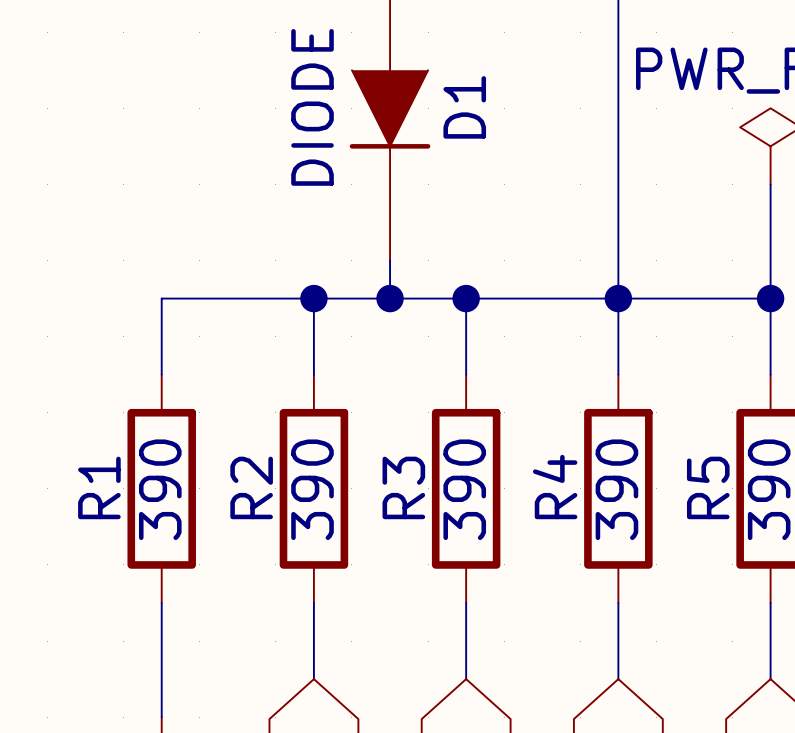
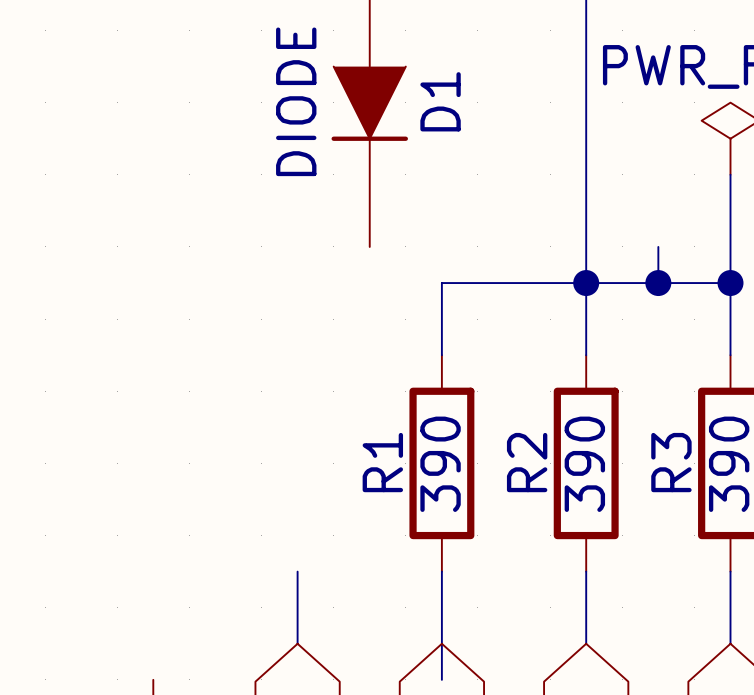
wire: (390, 260) (390, 298) -> (658, 246) (658, 283)
wire: (313, 298) (313, 374) -> none
junction: (313, 298) -> none
junction: (390, 298) -> none
wire: (466, 298) (161, 298) (161, 374) -> none
junction: (466, 298) -> none
junction: none -> (658, 283)
R3 name: R3 (403, 487) -> R1 (382, 462)
R4 name: R4 (555, 487) -> R2 (527, 462)
R5 name: R5 (708, 487) -> R3 (671, 462)
R1: 390 (161, 488) -> none
R2: 390 (313, 488) -> none
wire: (161, 603) (161, 717) -> none
wire: none -> (441, 643) (441, 679)

